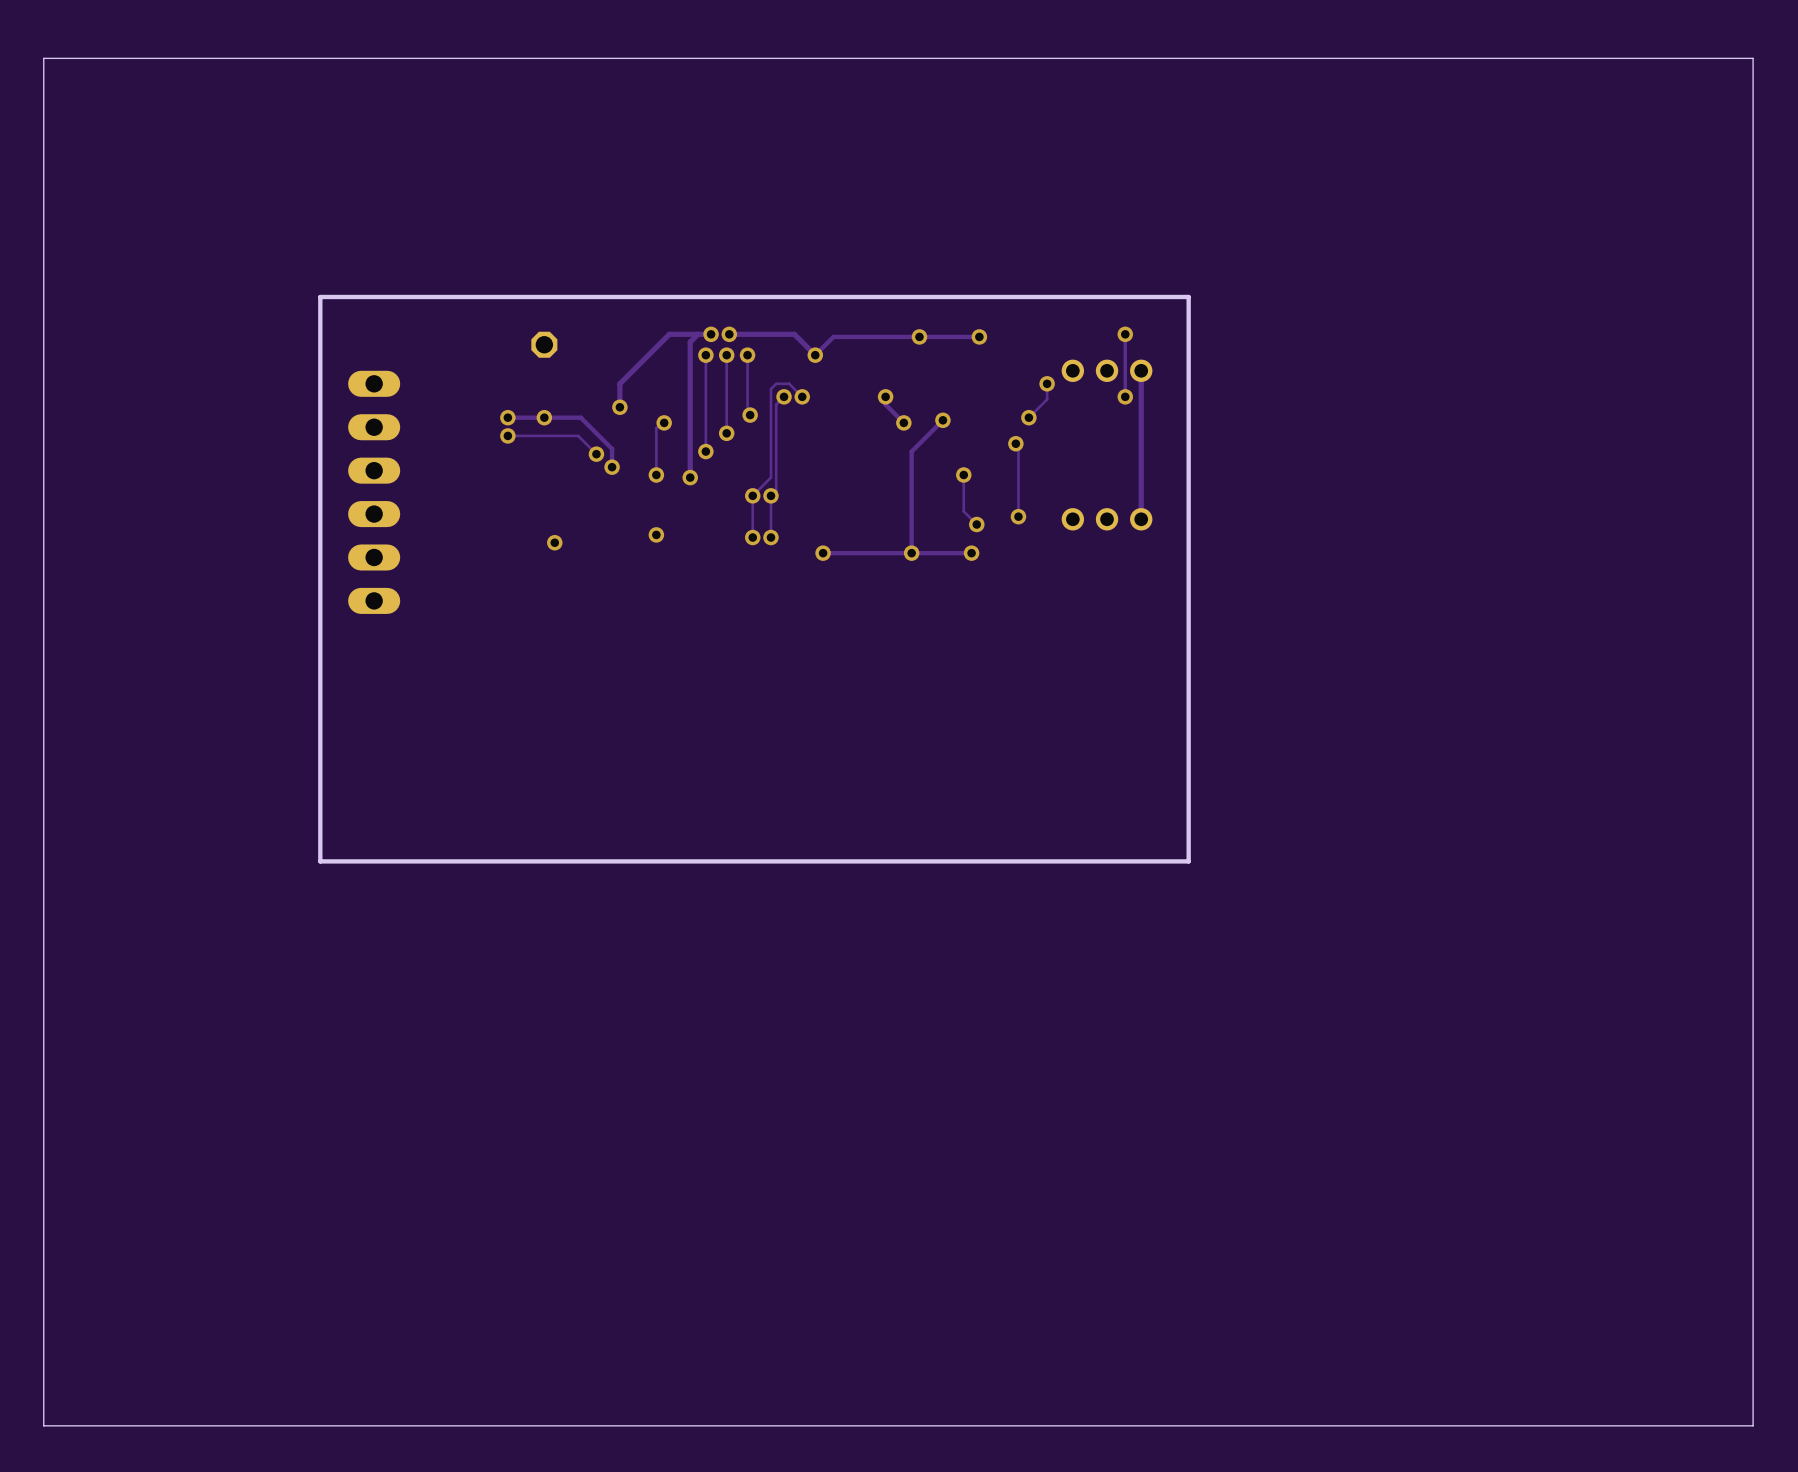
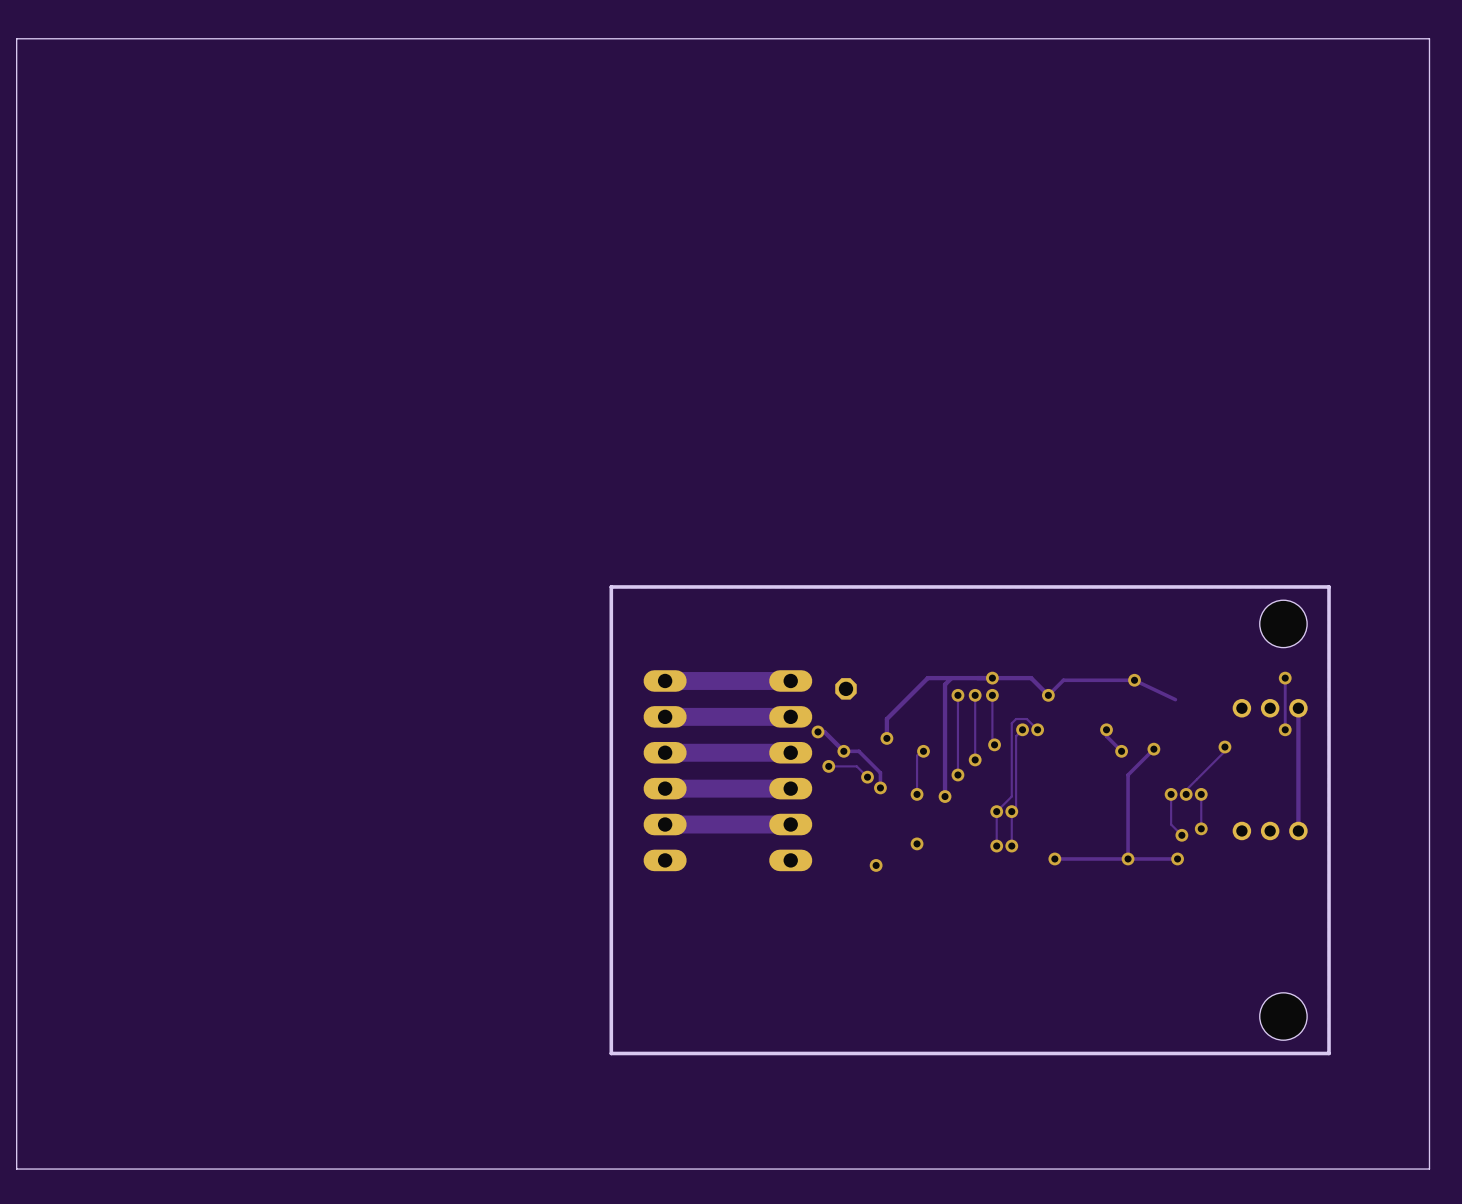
board edge: (1188, 296) (1188, 861) (320, 861) (320, 296) (1188, 296) -> none
track: (698, 334) (690, 342) (690, 477) -> none
track: (711, 334) (669, 334) (619, 383) (619, 407) -> none
via: (711, 334) -> none
track: (729, 334) (794, 334) (815, 355) (833, 336) (979, 336) -> none
via: (729, 334) -> none
track: (1125, 334) (1125, 396) -> none
via: (1125, 334) -> none
via: (919, 336) -> none
via: (979, 336) -> none
part: (544, 344) -> none
track: (705, 355) (705, 451) -> none
via: (705, 355) -> none
track: (726, 355) (726, 433) -> none
via: (726, 355) -> none
track: (747, 355) (747, 412) (750, 415) -> none
via: (747, 355) -> none
via: (815, 355) -> none
part: (1107, 370) -> none
track: (1141, 370) (1141, 519) -> none
track: (1047, 383) (1047, 399) (1028, 417) -> none
via: (1047, 383) -> none
track: (784, 396) (776, 404) (776, 490) (770, 495) (770, 537) -> none
via: (784, 396) -> none
track: (802, 396) (789, 383) (776, 383) (770, 389) (770, 477) (752, 495) (752, 537) -> none
via: (802, 396) -> none
track: (885, 396) (885, 404) (903, 422) -> none
via: (885, 396) -> none
via: (1125, 396) -> none
via: (619, 407) -> none
via: (750, 415) -> none
track: (507, 417) (580, 417) (612, 448) (612, 467) -> none
via: (507, 417) -> none
via: (544, 417) -> none
via: (1028, 417) -> none
track: (942, 420) (911, 451) (911, 553) -> none
via: (942, 420) -> none
track: (664, 422) (656, 428) (656, 475) -> none
via: (664, 422) -> none
via: (903, 422) -> none
via: (726, 433) -> none
track: (507, 435) (578, 435) (596, 454) -> none
via: (507, 435) -> none
track: (1015, 443) (1018, 446) (1018, 516) -> none
via: (1015, 443) -> none
via: (705, 451) -> none
via: (596, 454) -> none
via: (612, 467) -> none
via: (656, 475) -> none
track: (963, 475) (963, 511) (976, 524) -> none
via: (963, 475) -> none
via: (690, 477) -> none
part: (374, 492) -> none
via: (752, 495) -> none
via: (770, 495) -> none
via: (1018, 516) -> none
part: (1107, 519) -> none
via: (976, 524) -> none
via: (656, 534) -> none
via: (752, 537) -> none
via: (770, 537) -> none
via: (554, 542) -> none
via: (823, 553) -> none
via: (911, 553) -> none
track: (971, 553) (823, 553) -> none
via: (971, 553) -> none
board edge: none -> (1329, 586) (1329, 1053) (611, 1053) (611, 586) (1329, 586)
hole: none -> (1283, 623)
track: none -> (951, 678) (945, 684) (945, 796)
via: none -> (992, 678)
track: none -> (1285, 678) (1285, 729)
via: none -> (1285, 678)
via: none -> (1134, 680)
track: none -> (790, 680) (665, 680)
part: none -> (845, 688)
track: none -> (957, 695) (957, 775)
via: none -> (957, 695)
track: none -> (975, 695) (975, 759)
via: none -> (975, 695)
track: none -> (992, 695) (992, 742) (994, 744)
via: none -> (992, 695)
via: none -> (1048, 695)
track: none -> (1175, 699) (1134, 680) (1063, 680) (1048, 695) (1031, 678) (927, 678) (886, 719) (886, 738)
part: none -> (1270, 708)
track: none -> (1298, 708) (1298, 830)
track: none -> (790, 716) (665, 716)
track: none -> (1022, 729) (1016, 736) (1016, 807) (1011, 811) (1011, 846)
via: none -> (1022, 729)
track: none -> (1037, 729) (1026, 719) (1016, 719) (1011, 723) (1011, 796) (996, 811) (996, 846)
via: none -> (1037, 729)
track: none -> (1106, 729) (1106, 736) (1121, 751)
via: none -> (1106, 729)
via: none -> (1285, 729)
track: none -> (818, 731) (824, 731) (843, 751) (858, 751) (880, 772) (880, 787)
via: none -> (818, 731)
via: none -> (886, 738)
via: none -> (994, 744)
track: none -> (1224, 747) (1224, 751) (1186, 790) (1186, 794)
via: none -> (1224, 747)
track: none -> (1153, 749) (1128, 775) (1128, 858)
via: none -> (1153, 749)
via: none -> (843, 751)
track: none -> (923, 751) (917, 755) (917, 794)
via: none -> (923, 751)
via: none -> (1121, 751)
track: none -> (790, 752) (665, 752)
via: none -> (975, 759)
track: none -> (828, 766) (856, 766) (867, 777)
via: none -> (828, 766)
part: none -> (665, 770)
part: none -> (790, 770)
via: none -> (957, 775)
via: none -> (867, 777)
via: none -> (880, 787)
track: none -> (790, 788) (665, 788)
via: none -> (917, 794)
track: none -> (1171, 794) (1171, 824) (1181, 835)
via: none -> (1171, 794)
via: none -> (1186, 794)
track: none -> (1201, 794) (1201, 828)
via: none -> (1201, 794)
via: none -> (945, 796)
via: none -> (996, 811)
via: none -> (1011, 811)
track: none -> (790, 824) (665, 824)
via: none -> (1201, 828)
part: none -> (1270, 830)
via: none -> (1181, 835)
via: none -> (917, 843)
via: none -> (996, 846)
via: none -> (1011, 846)
via: none -> (1054, 858)
via: none -> (1128, 858)
track: none -> (1177, 858) (1054, 858)
via: none -> (1177, 858)
via: none -> (876, 865)
hole: none -> (1283, 1016)

